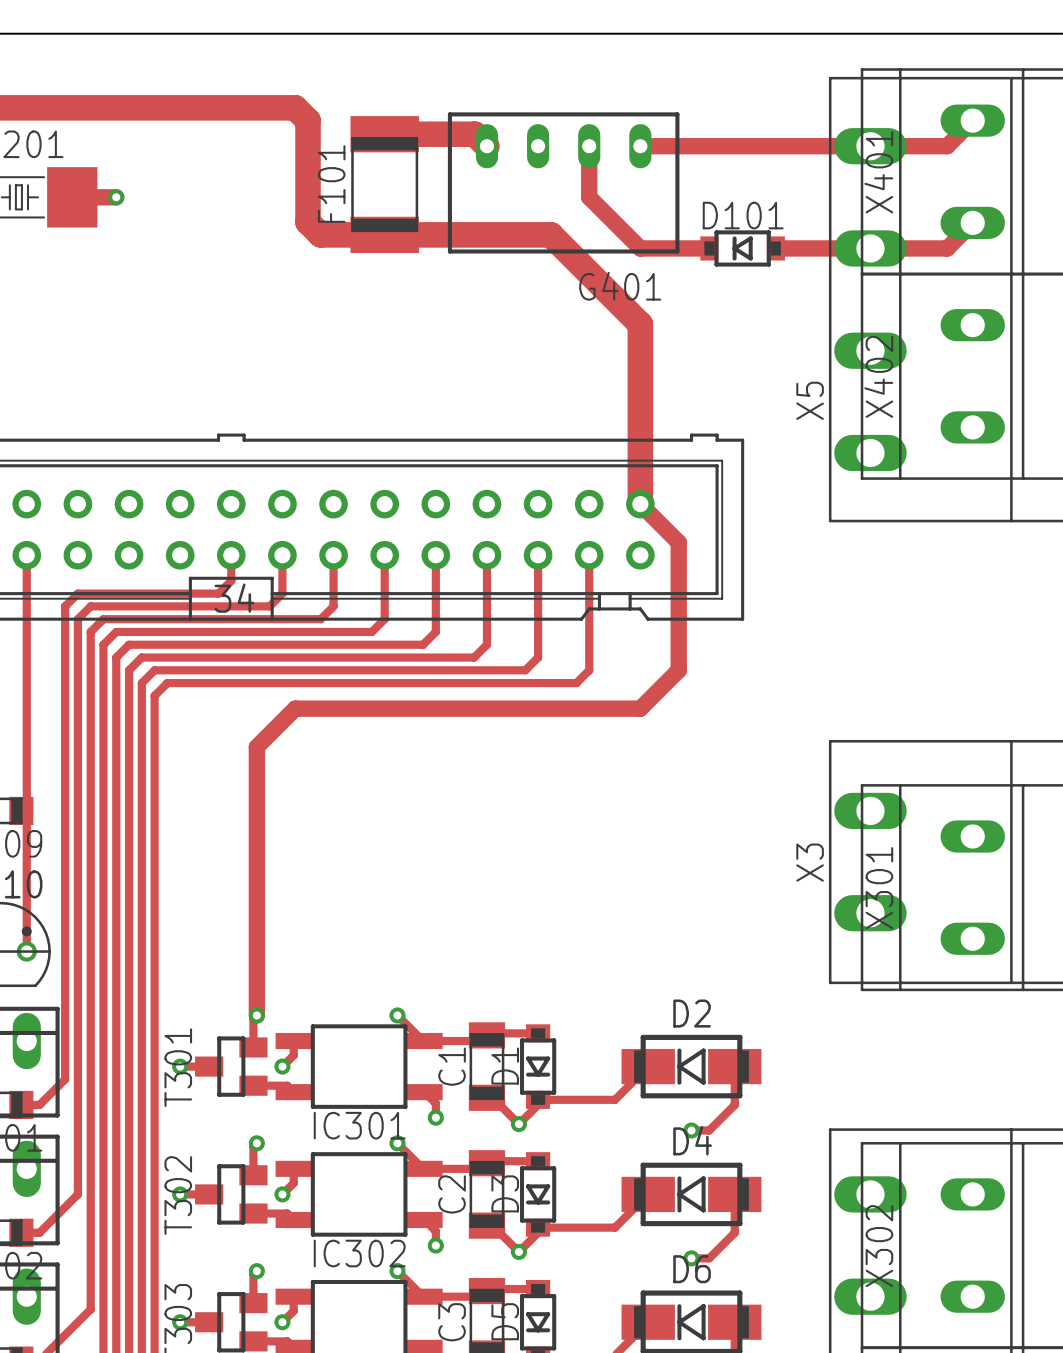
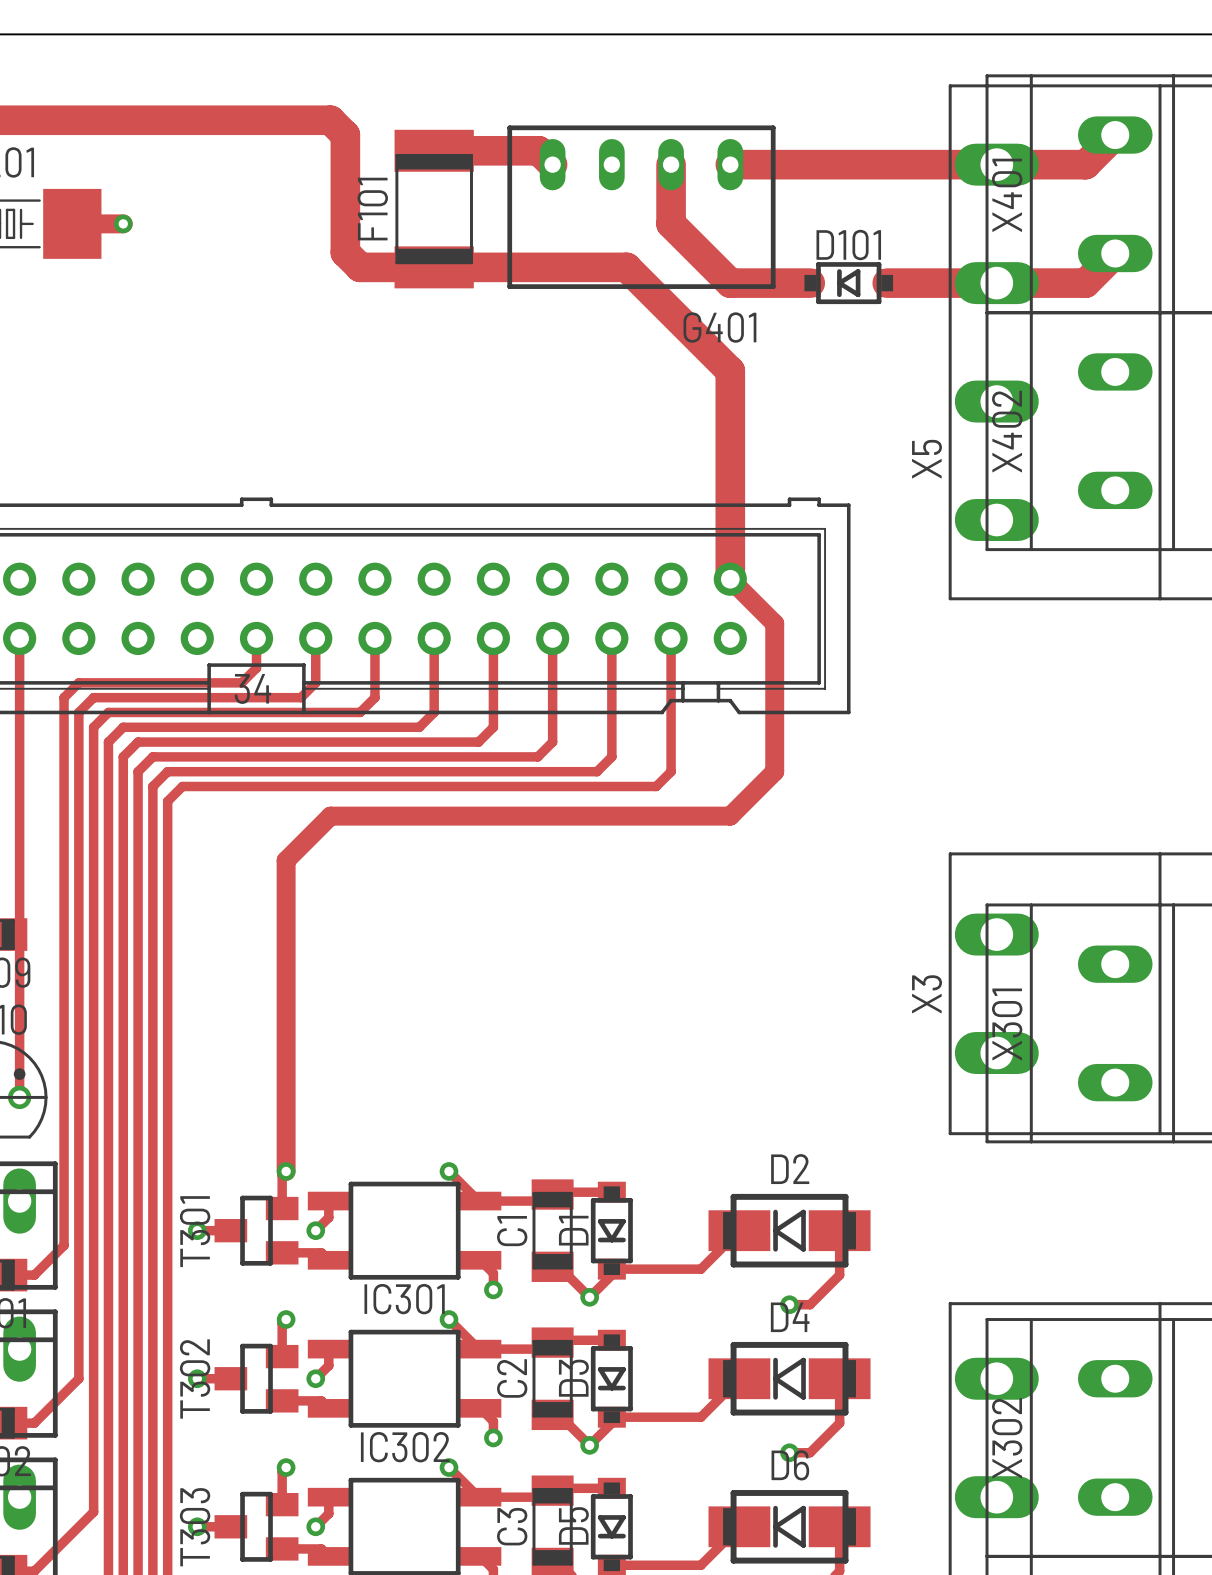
track width: thin (972, 120) (947, 146) (640, 146) -> thick (1115, 135) (1085, 164) (730, 164)
track width: thin (589, 146) (589, 197) (640, 248) (709, 248) -> thick (671, 164) (671, 223) (730, 283) (810, 283)
track width: thin (972, 222) (947, 248) (775, 248) -> thick (1115, 253) (1085, 283) (887, 283)

